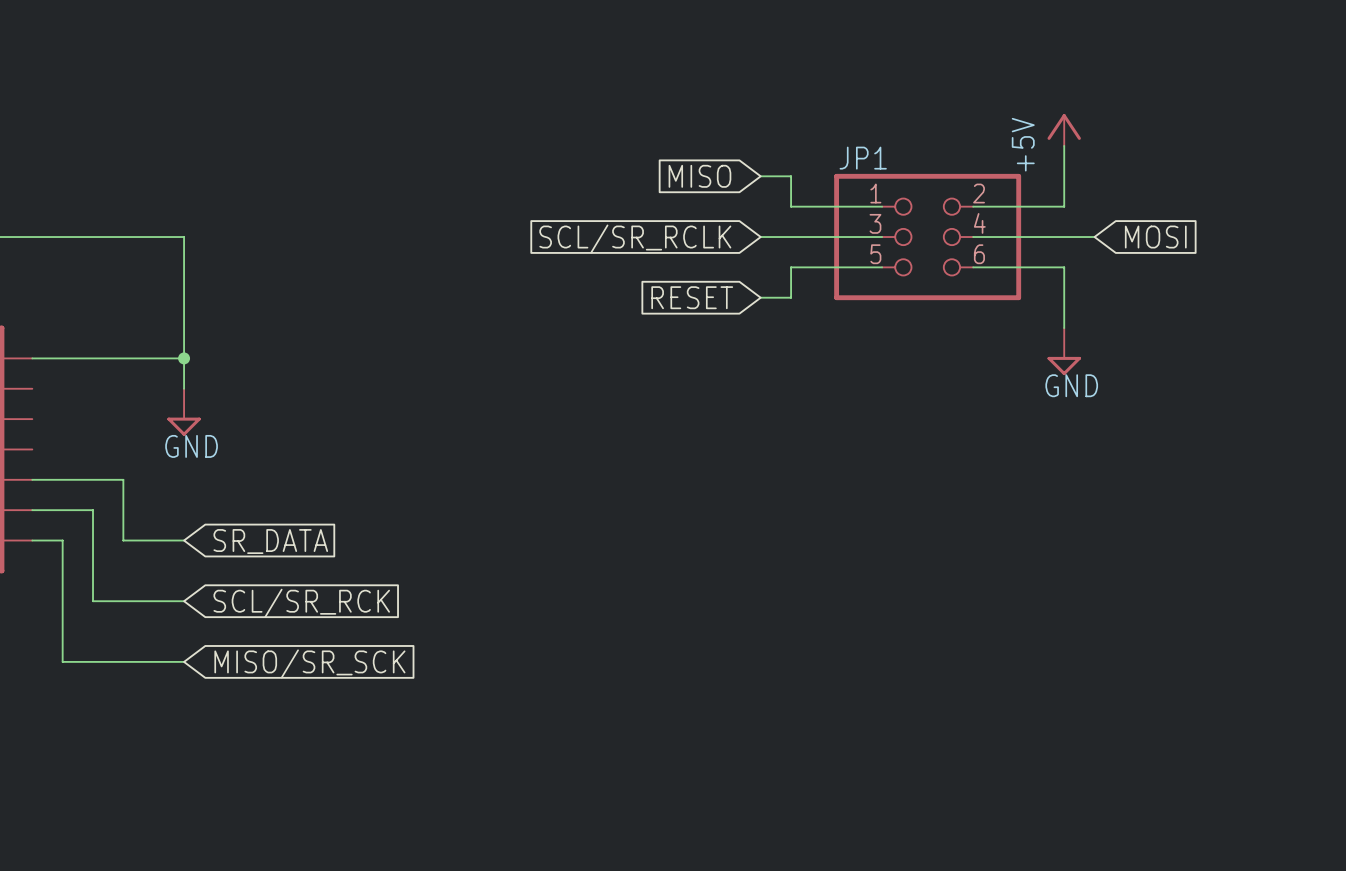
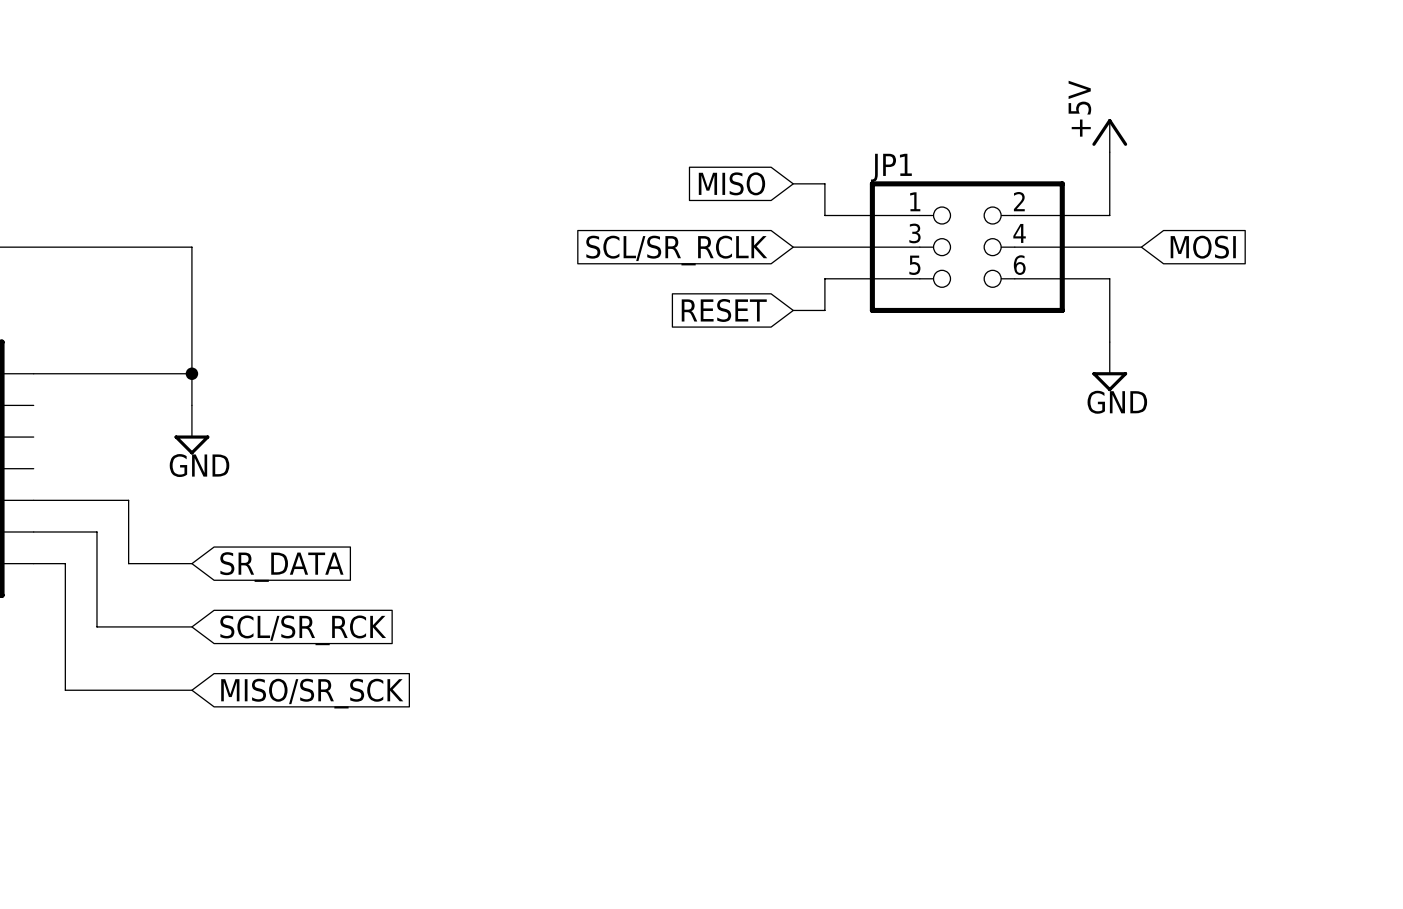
power symbol text position: +5V (1023, 144) -> +5V (1079, 108)

